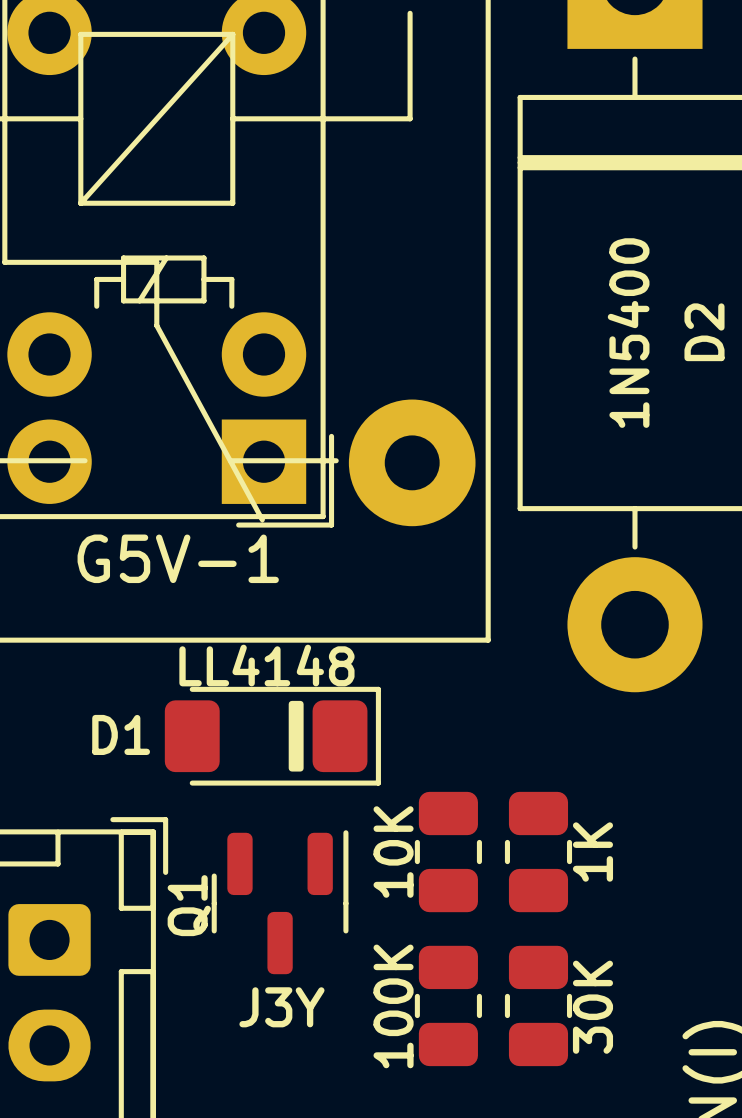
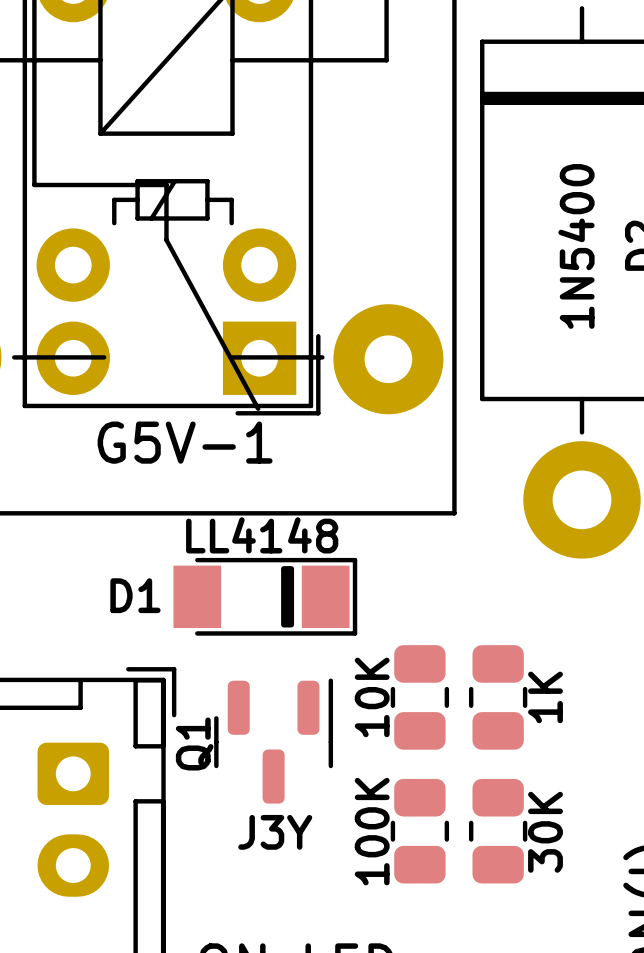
D1 footprint: [164, 686, 381, 786] -> [173, 557, 358, 636]

